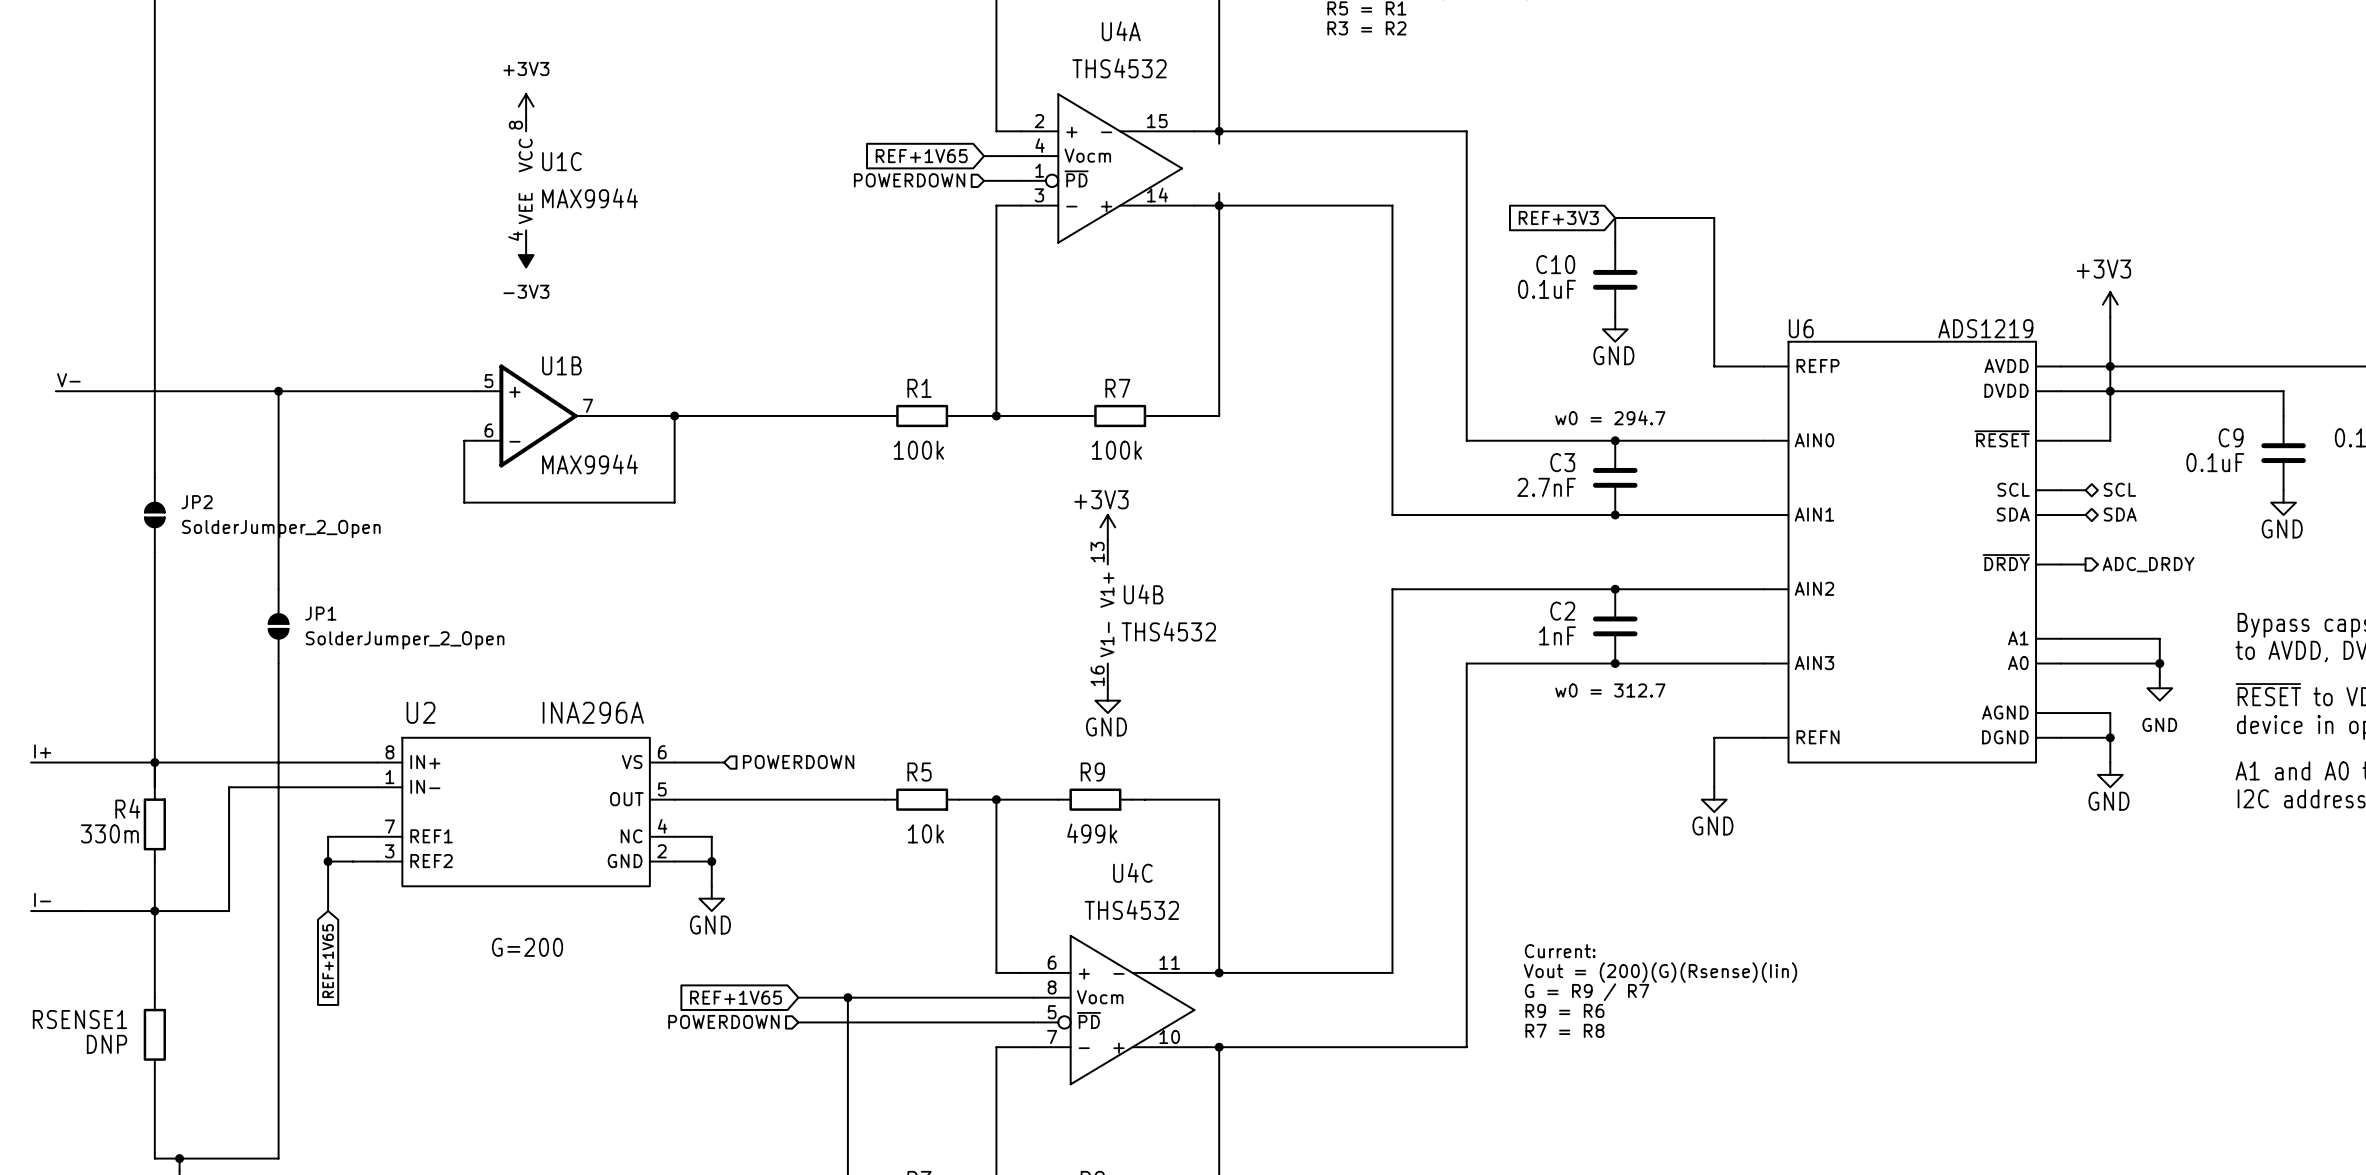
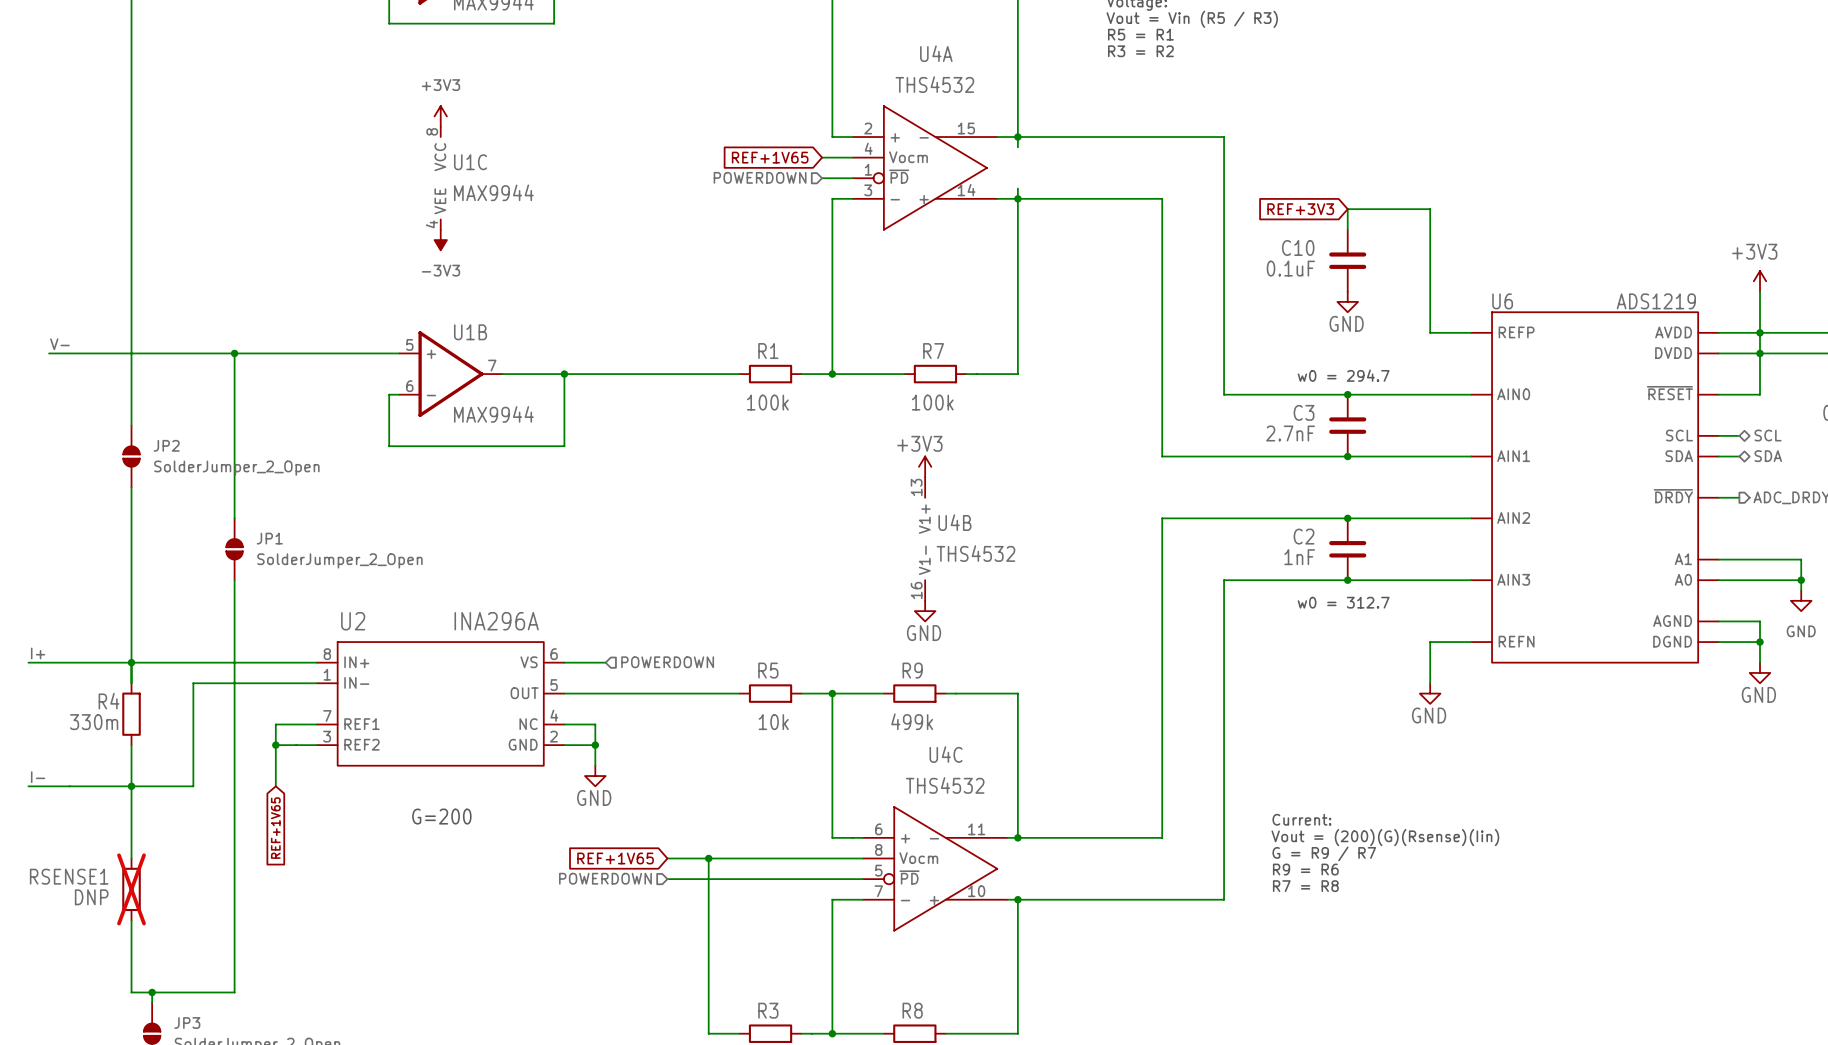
RSENSE1 do-not-place cross: none -> (131, 889)

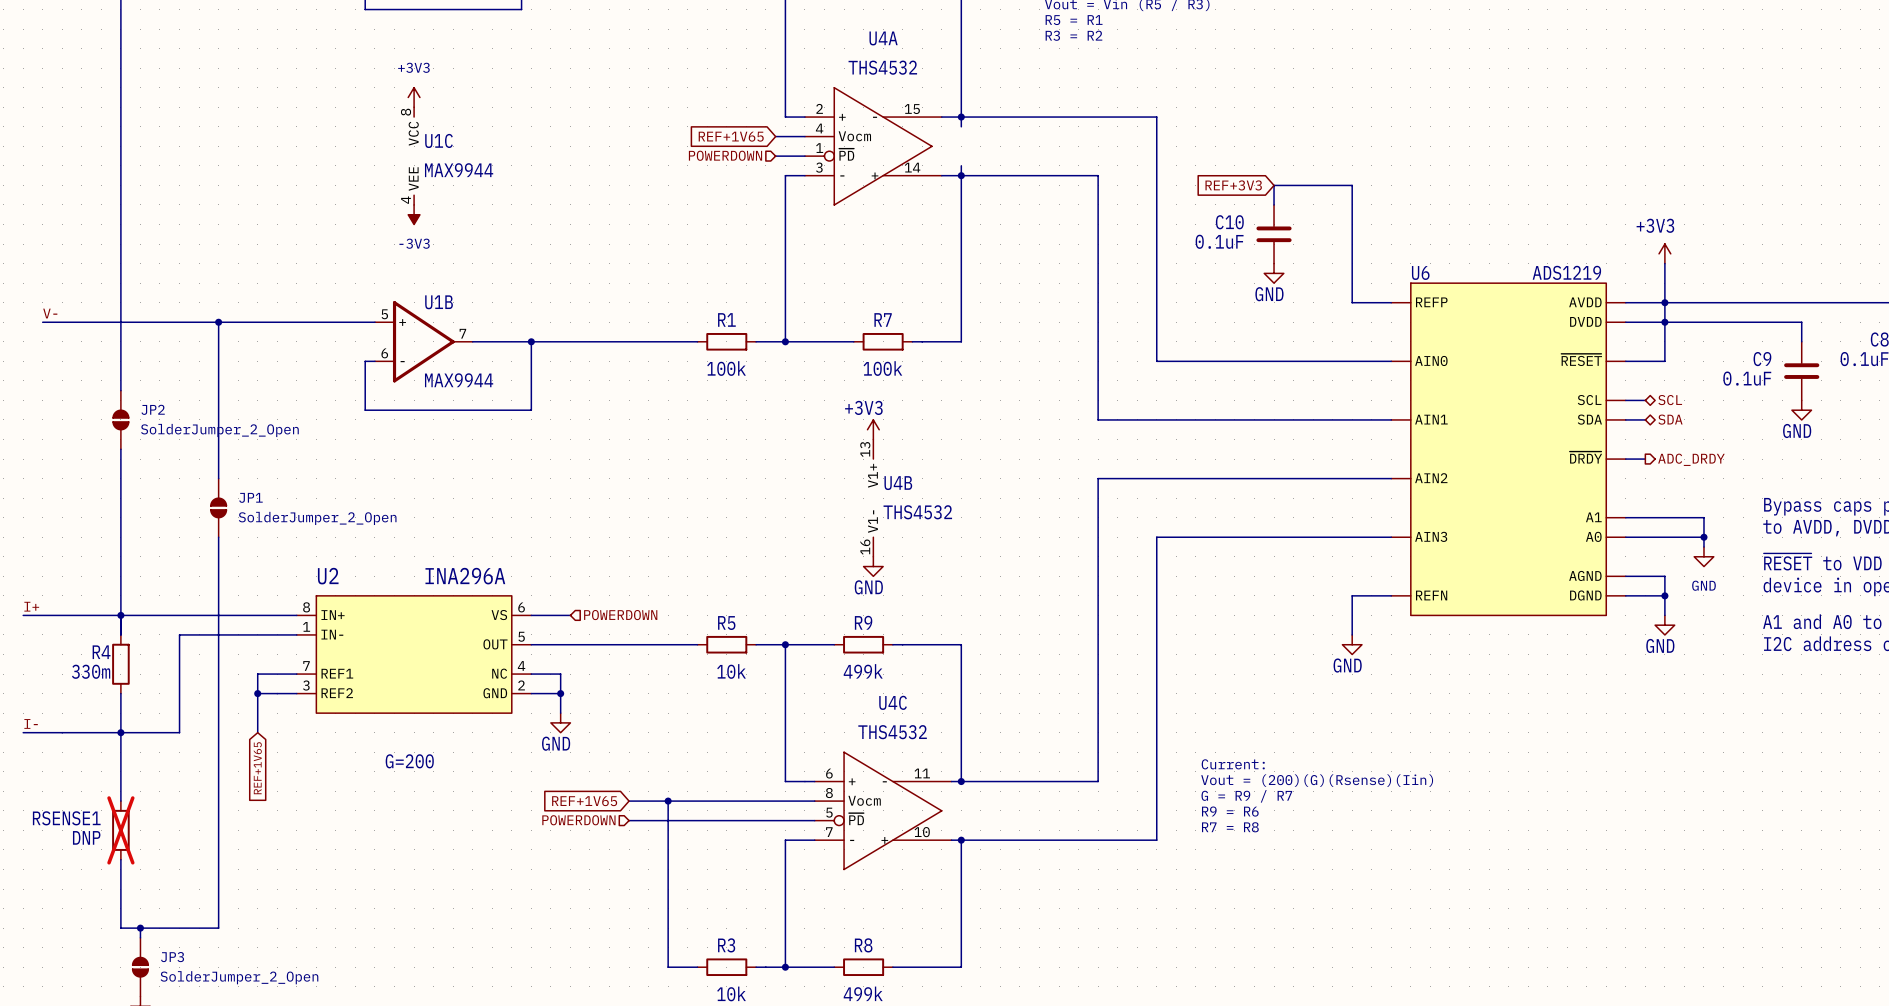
text: w0 = 294.7 (1343, 375) -> none
junction: (1347, 394) -> none
C3: 2.7nF (1347, 425) -> none
junction: (1347, 456) -> none
junction: (1347, 518) -> none
C2: 1nF (1347, 549) -> none
junction: (1347, 580) -> none
text: w0 = 312.7 (1343, 602) -> none

